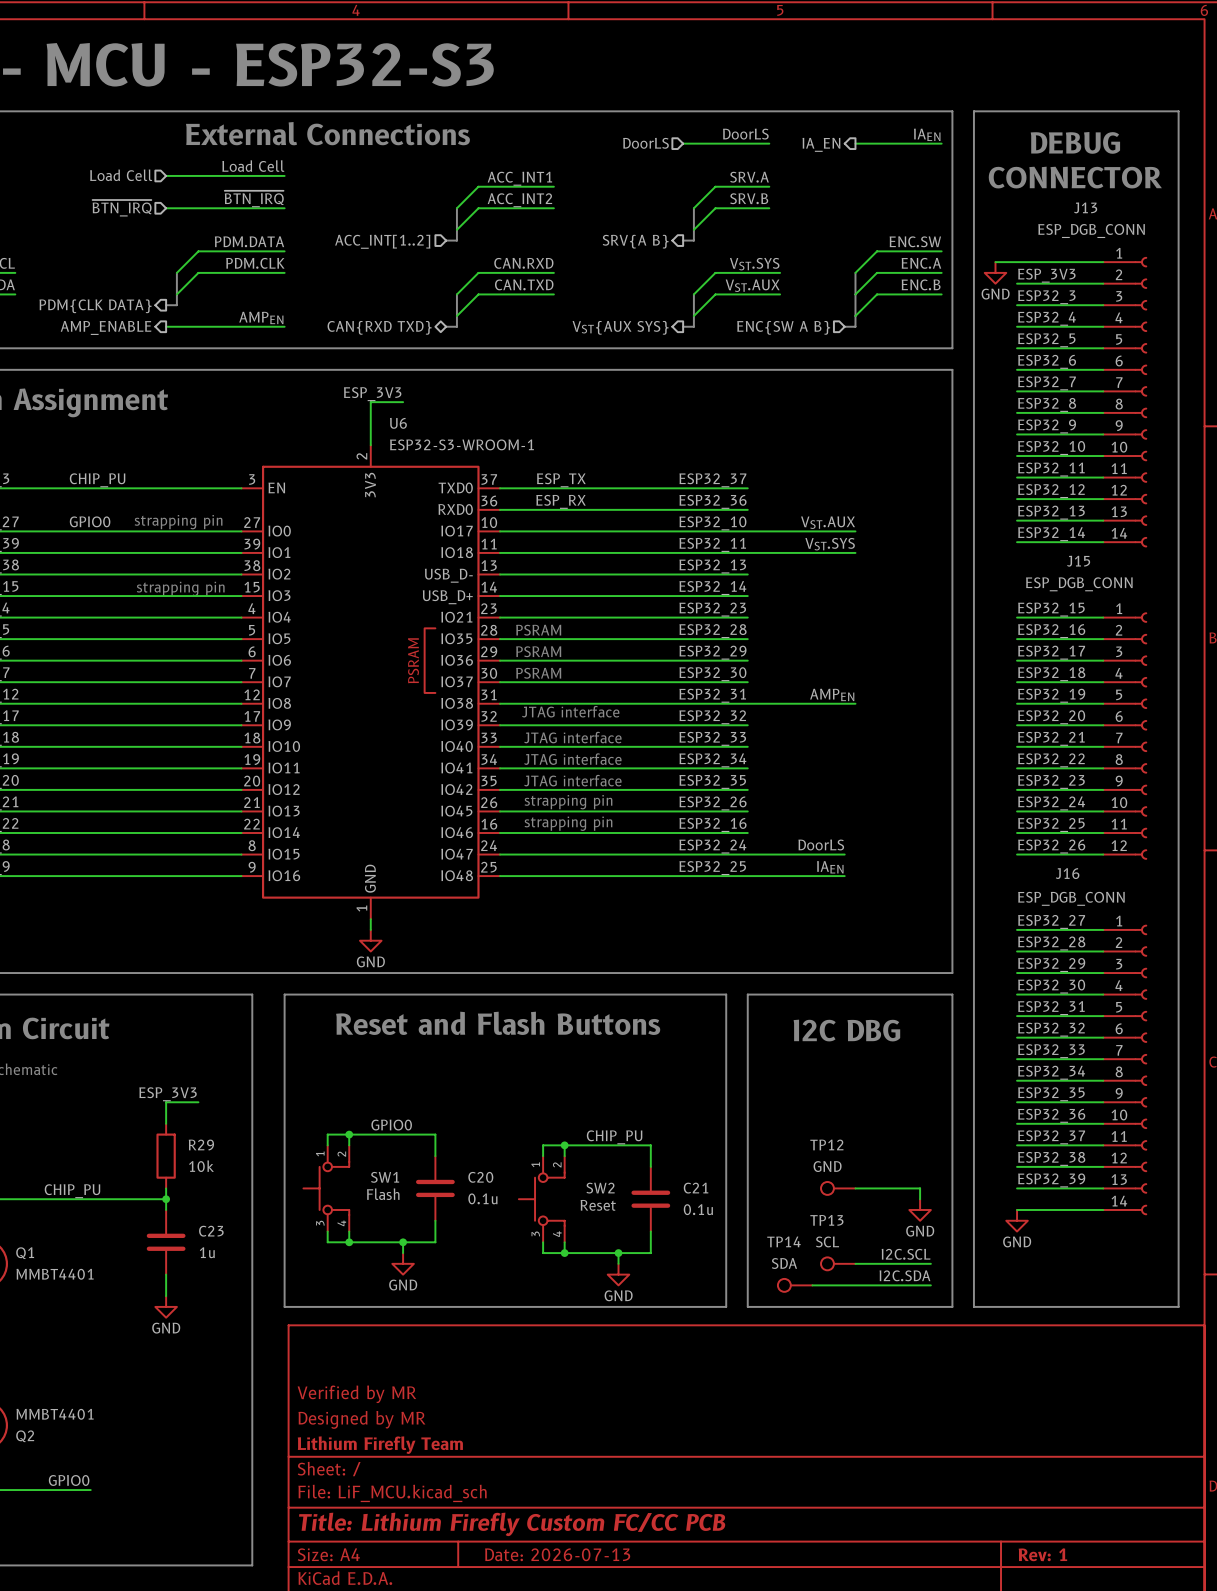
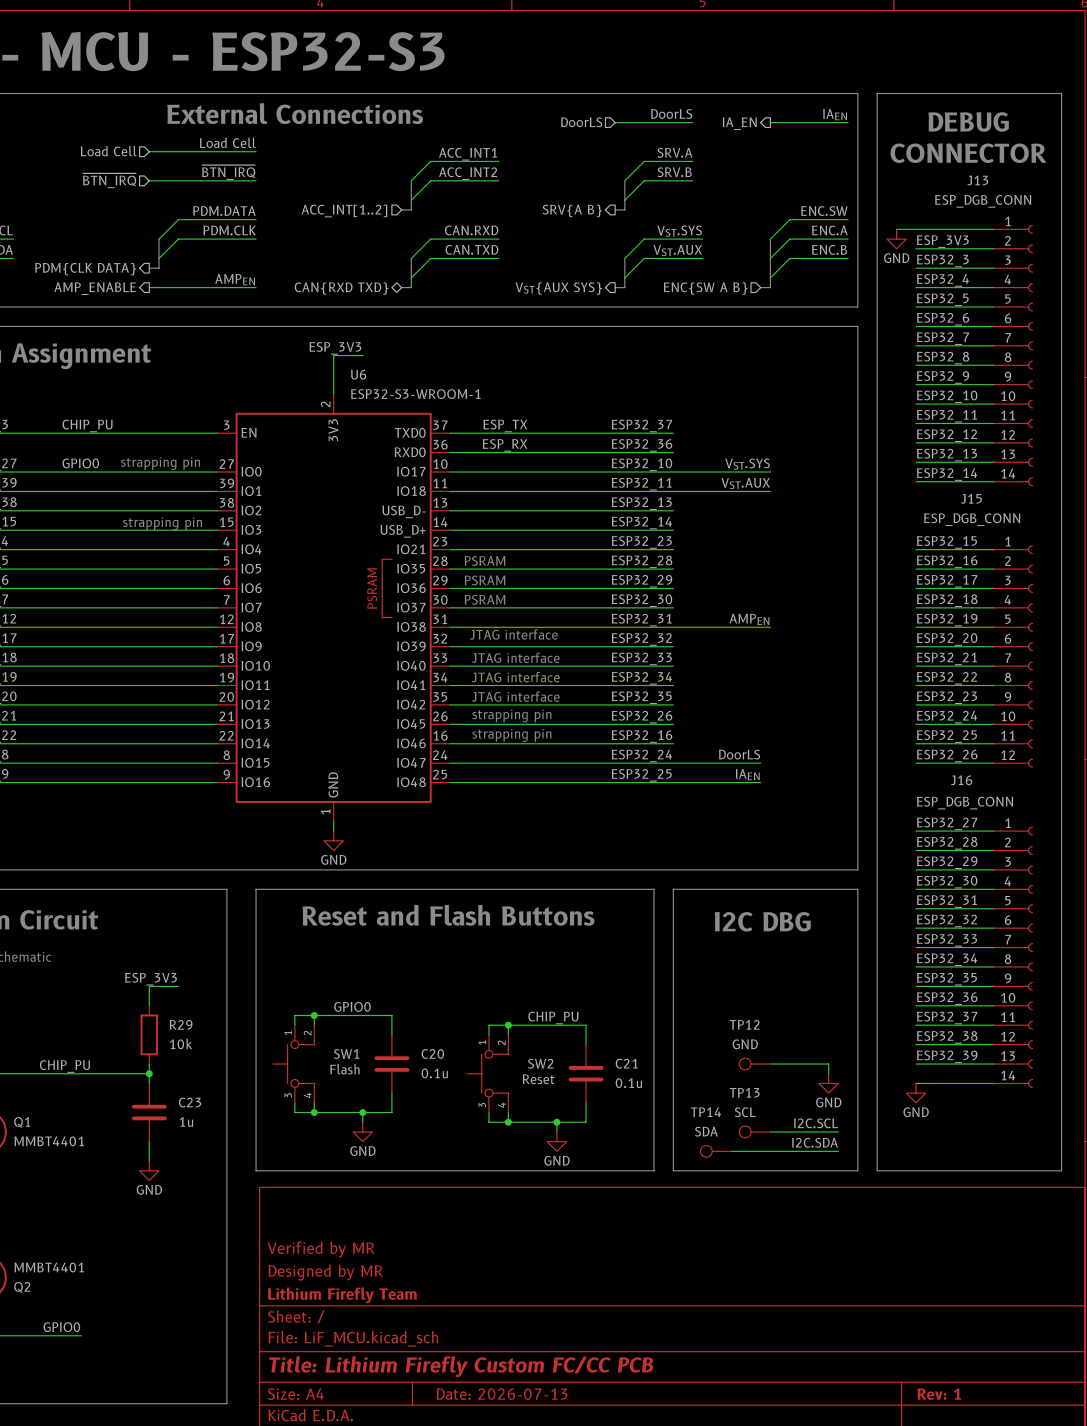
label: VST.AUX (828, 522) -> VST.SYS (747, 464)
label: VST.SYS (830, 544) -> VST.AUX (745, 483)

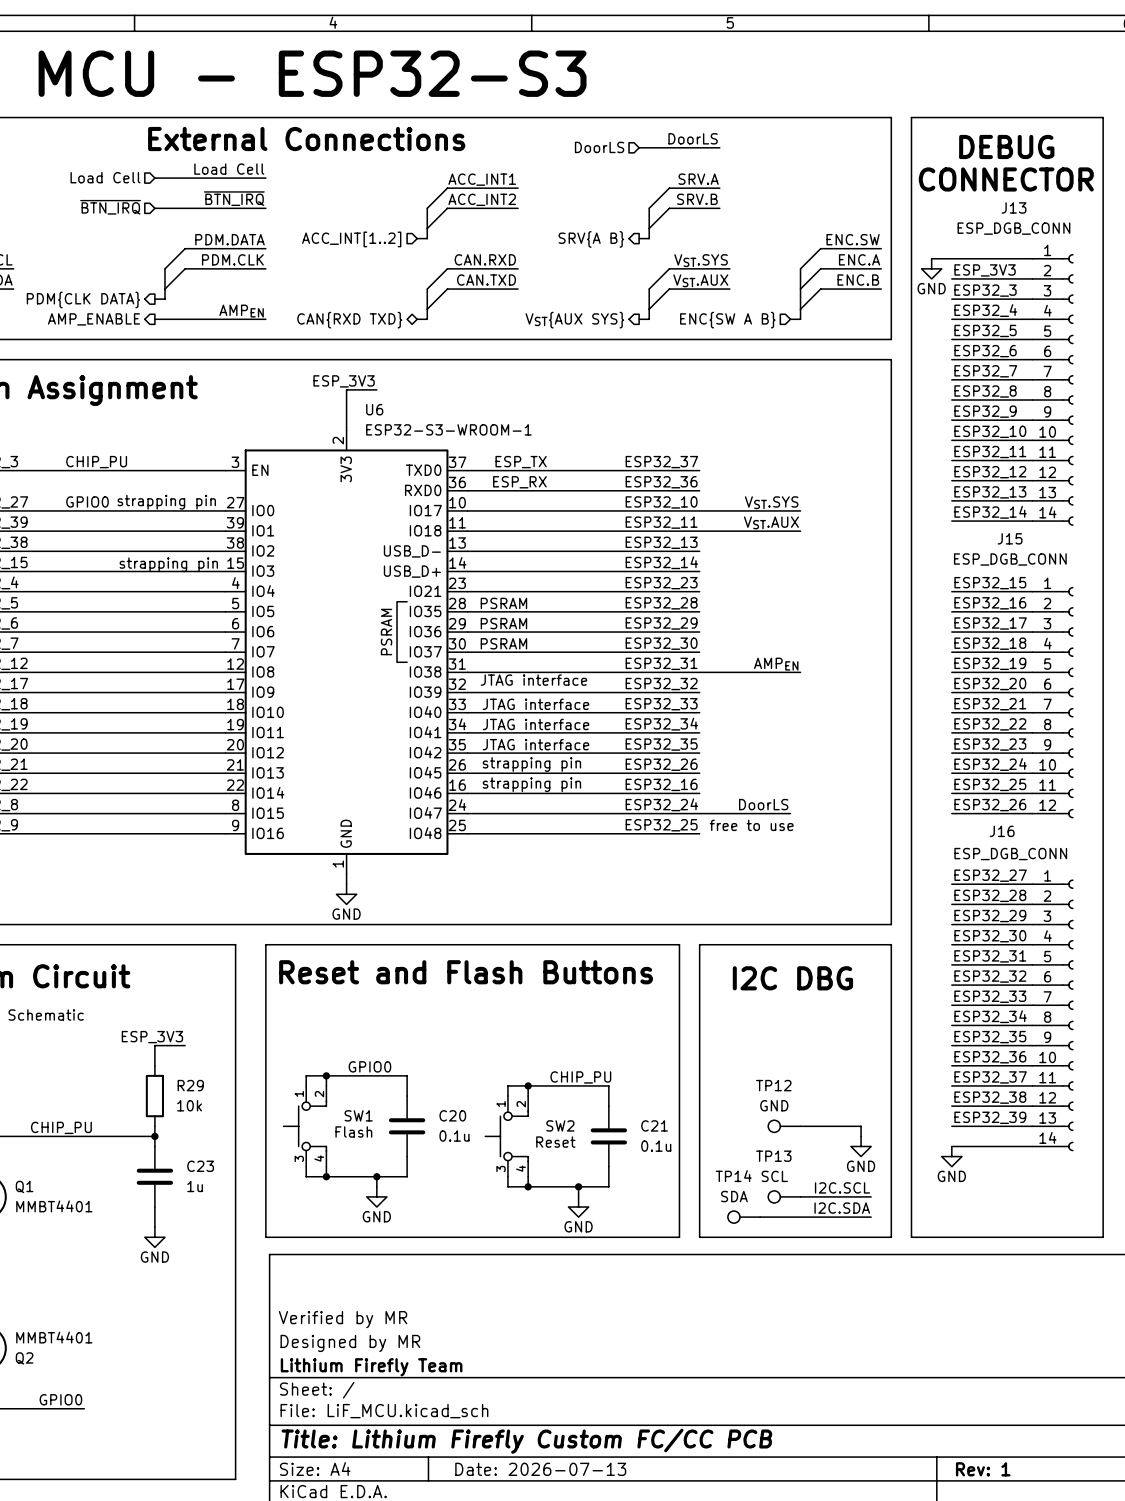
label: IAEN (835, 114) -> none
wire: (770, 122) (848, 122) -> none
hierarchical label: IA_EN (739, 123) -> none
text: none -> free to use (751, 825)
label: IAEN (747, 774) -> none
wire: (673, 782) (760, 782) -> none

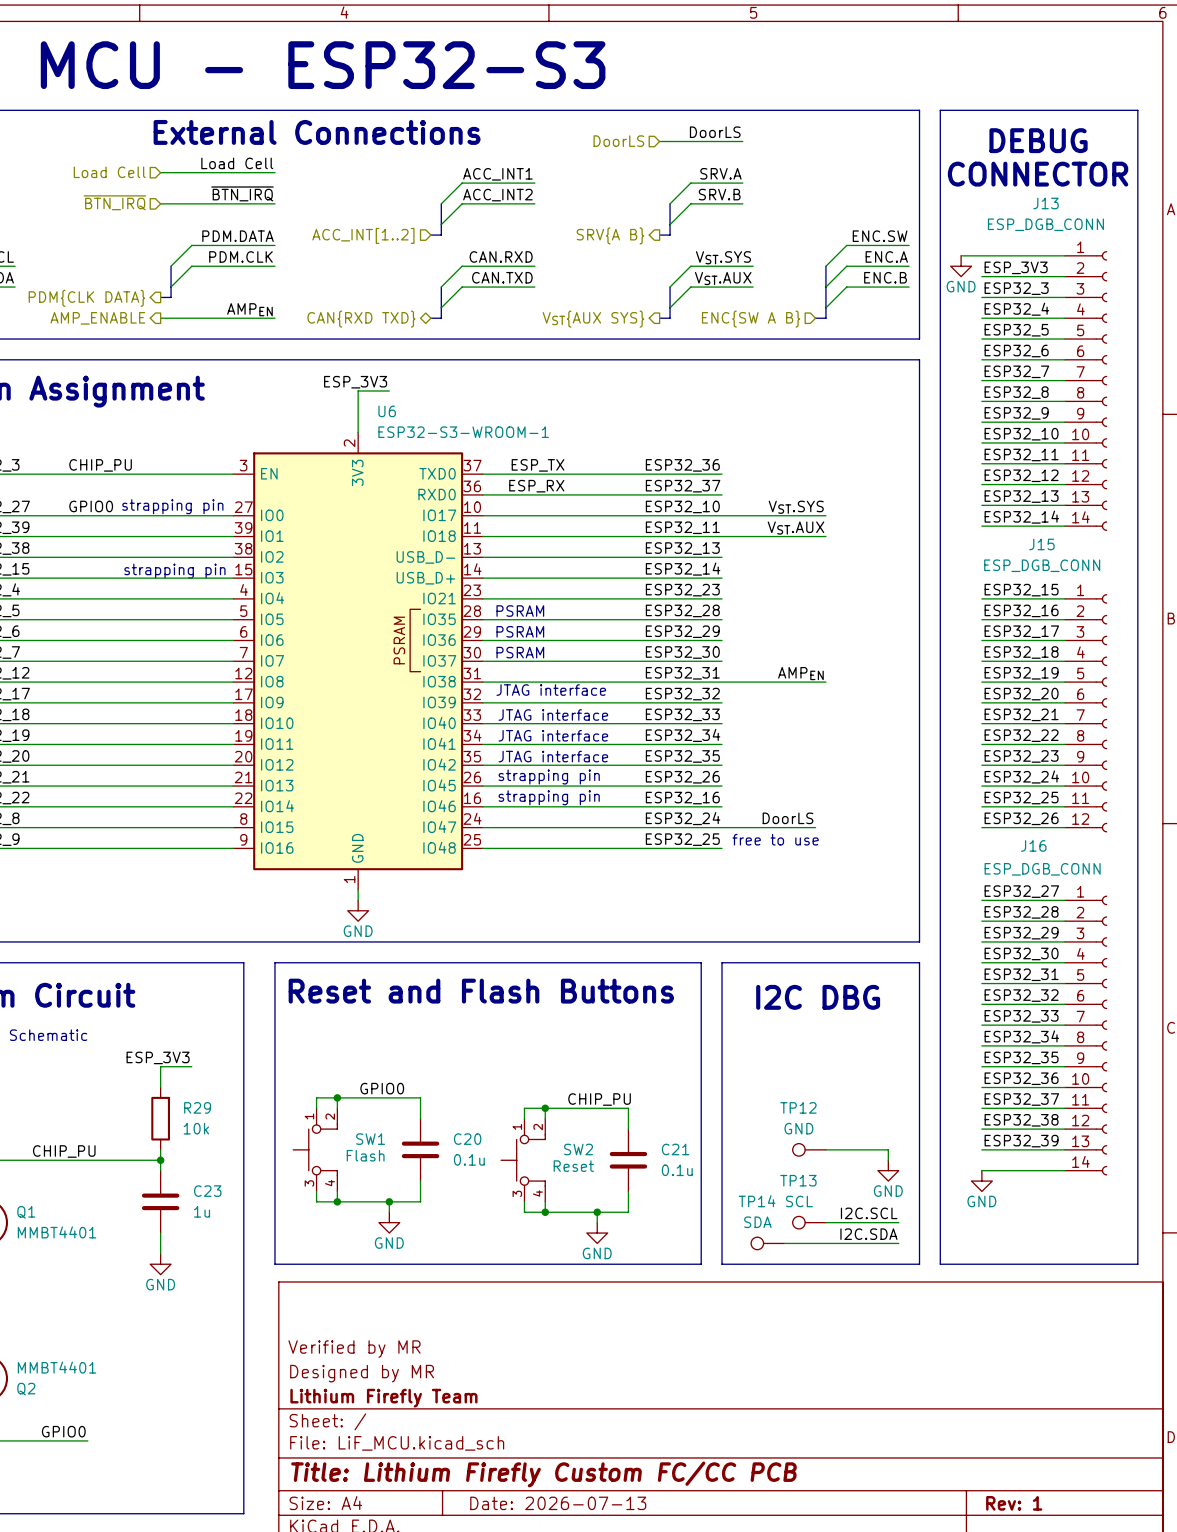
label: ESP32_37 (661, 462) -> ESP32_36 (682, 465)
label: ESP32_36 (661, 482) -> ESP32_37 (683, 486)

